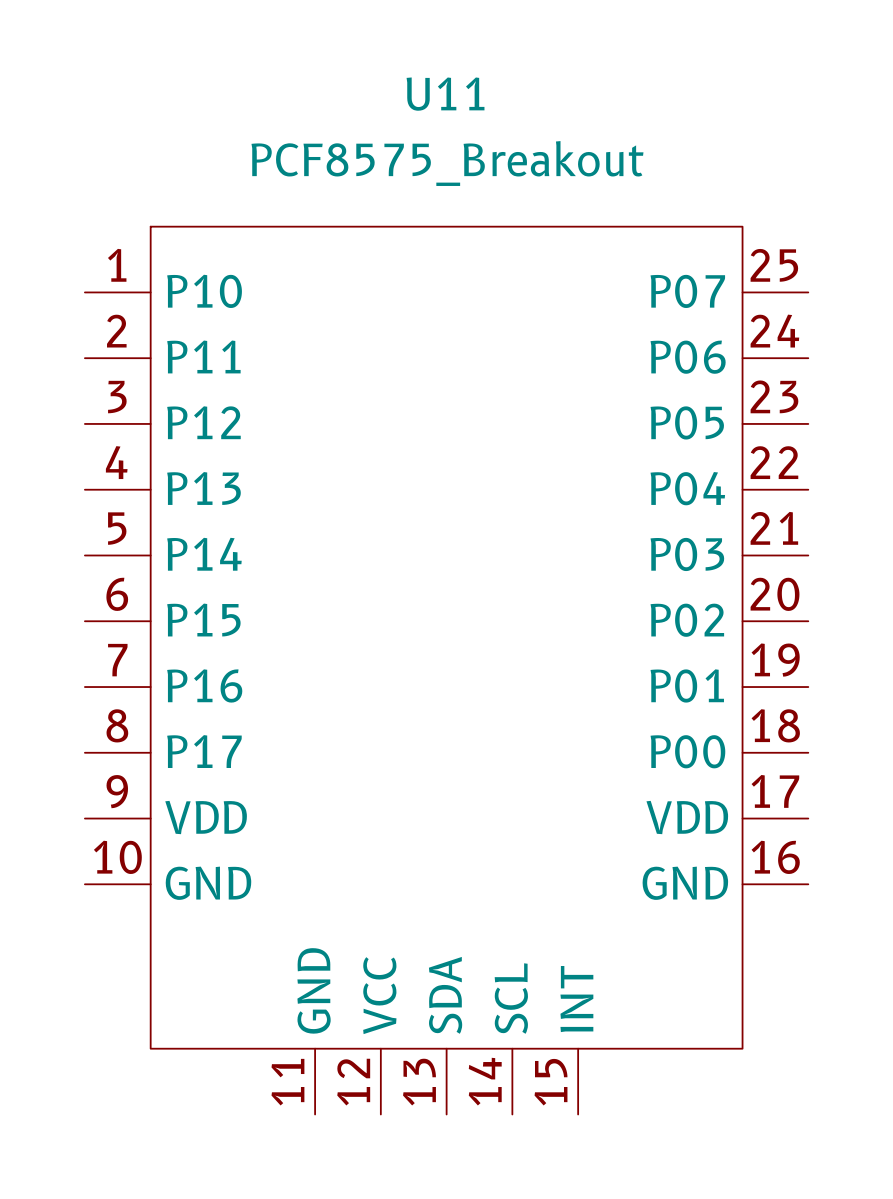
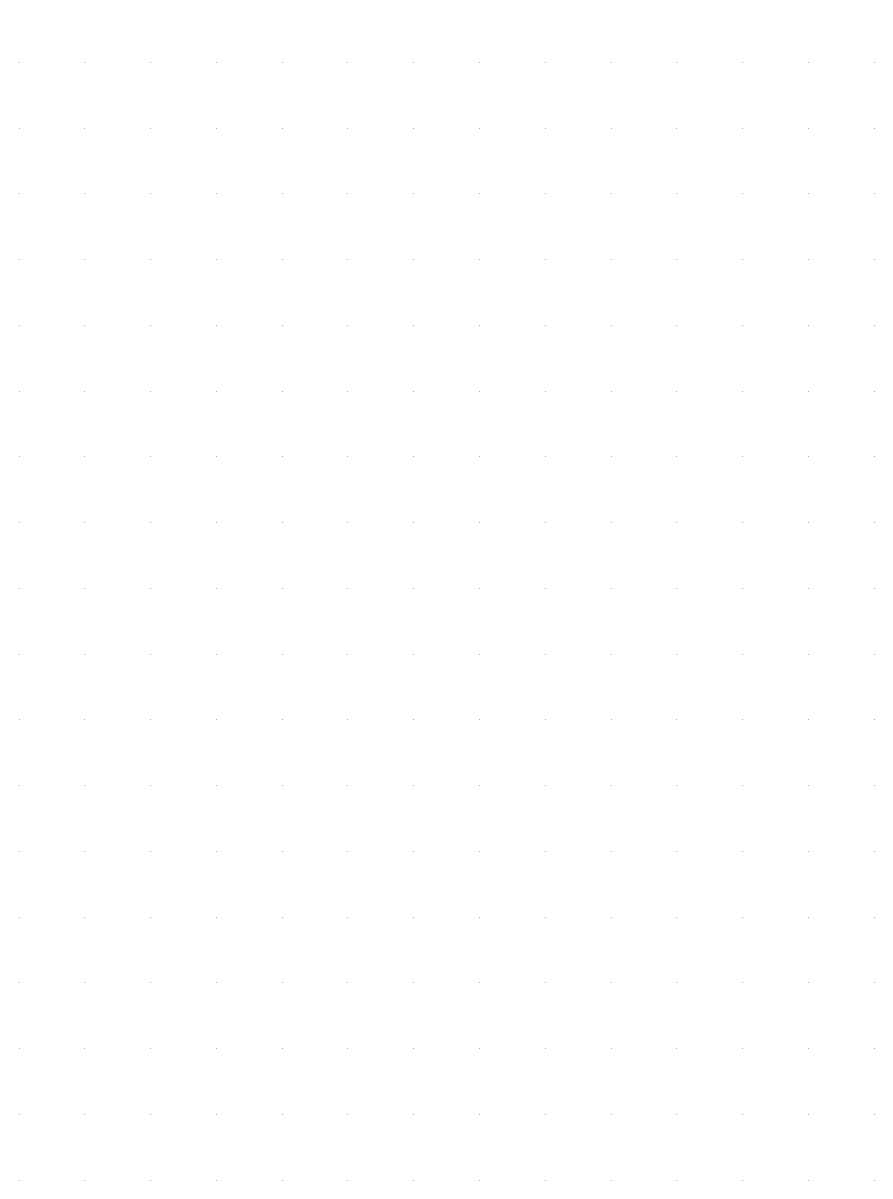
U11: PCF8575_Breakout (446, 670) -> none

